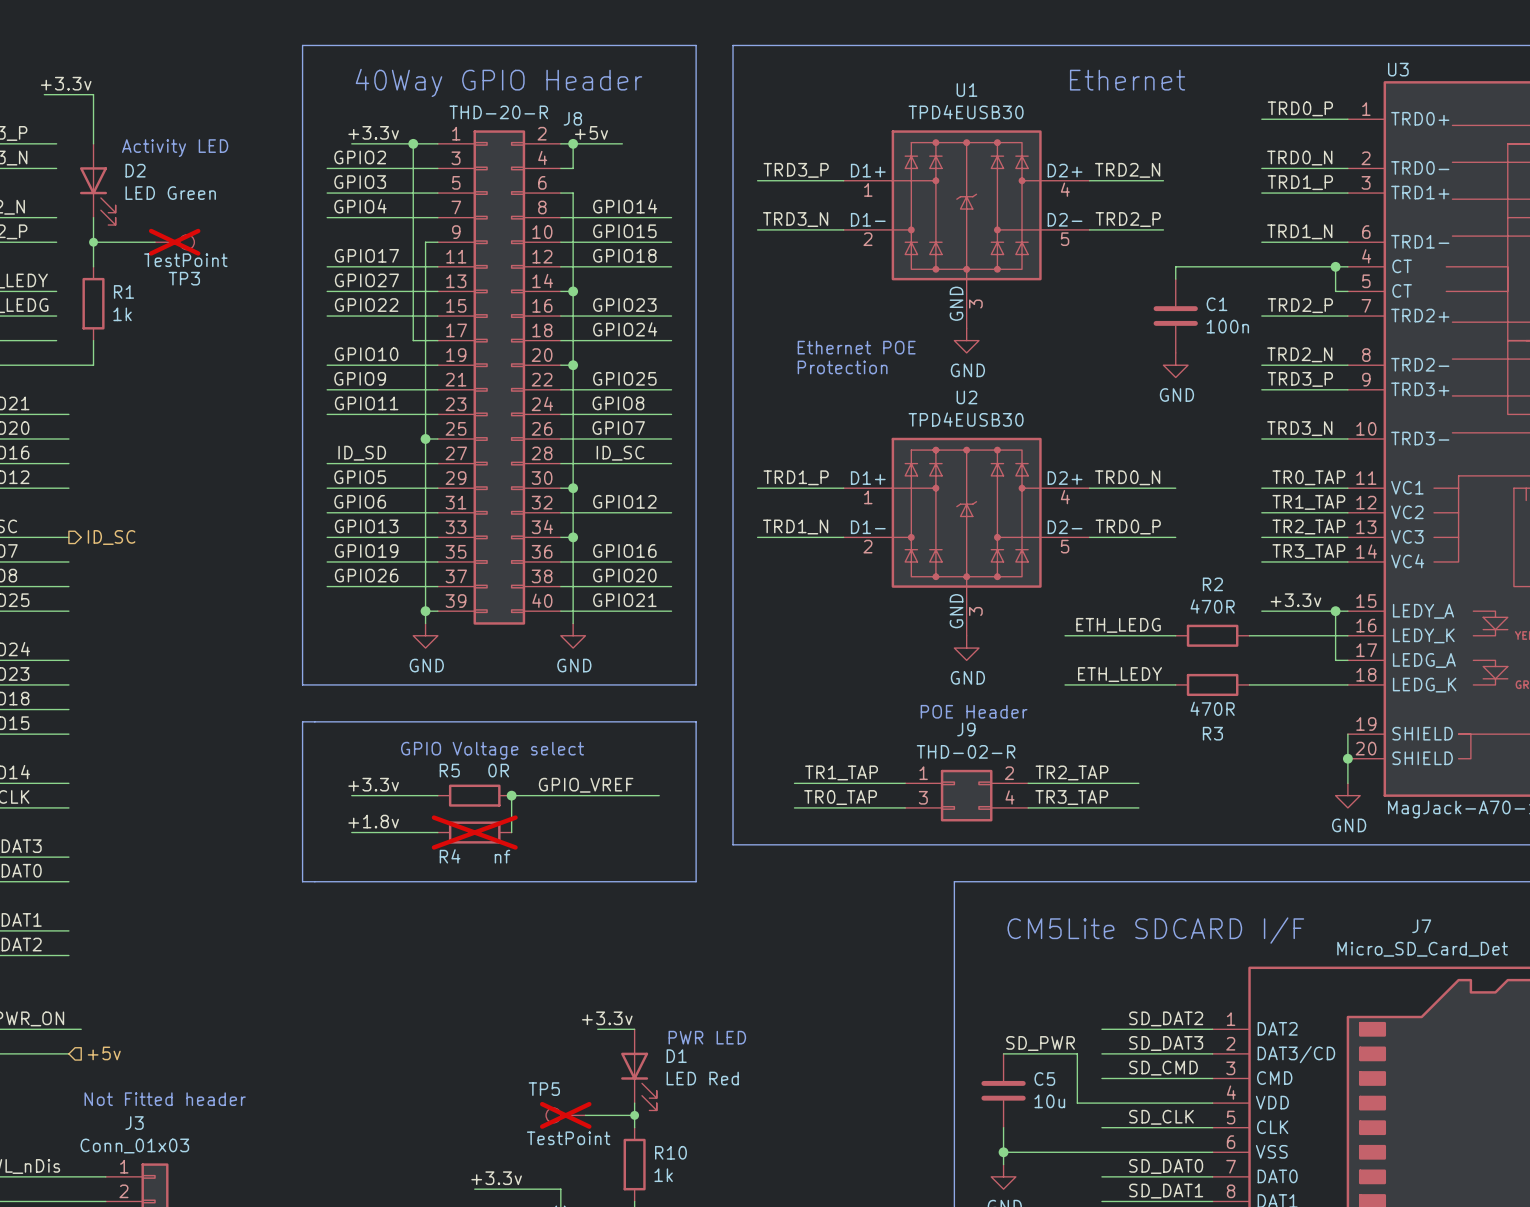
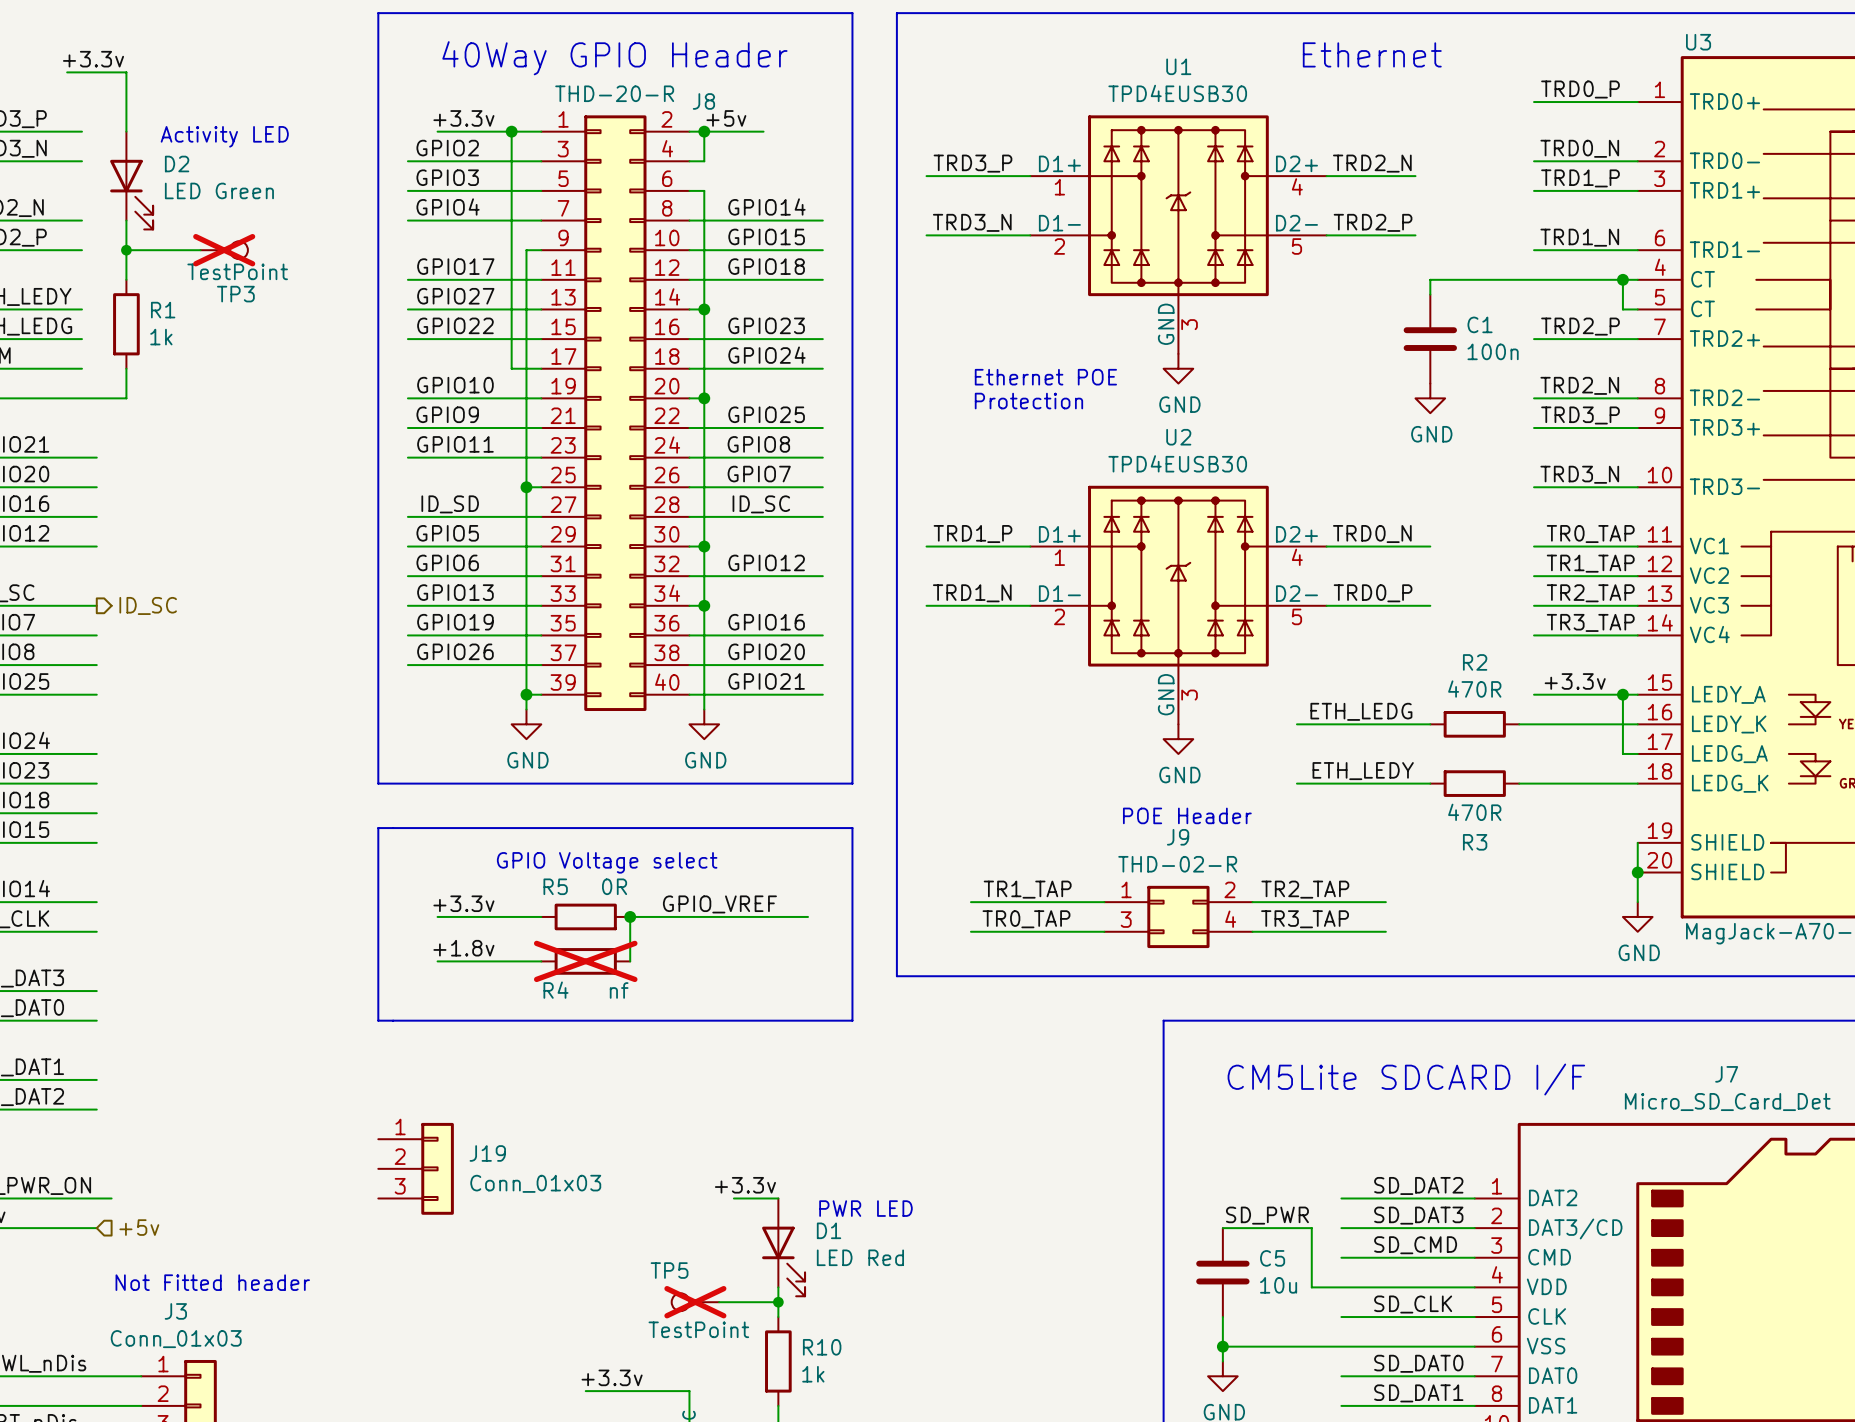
J19: none -> Conn_01x03 (416, 1168)

